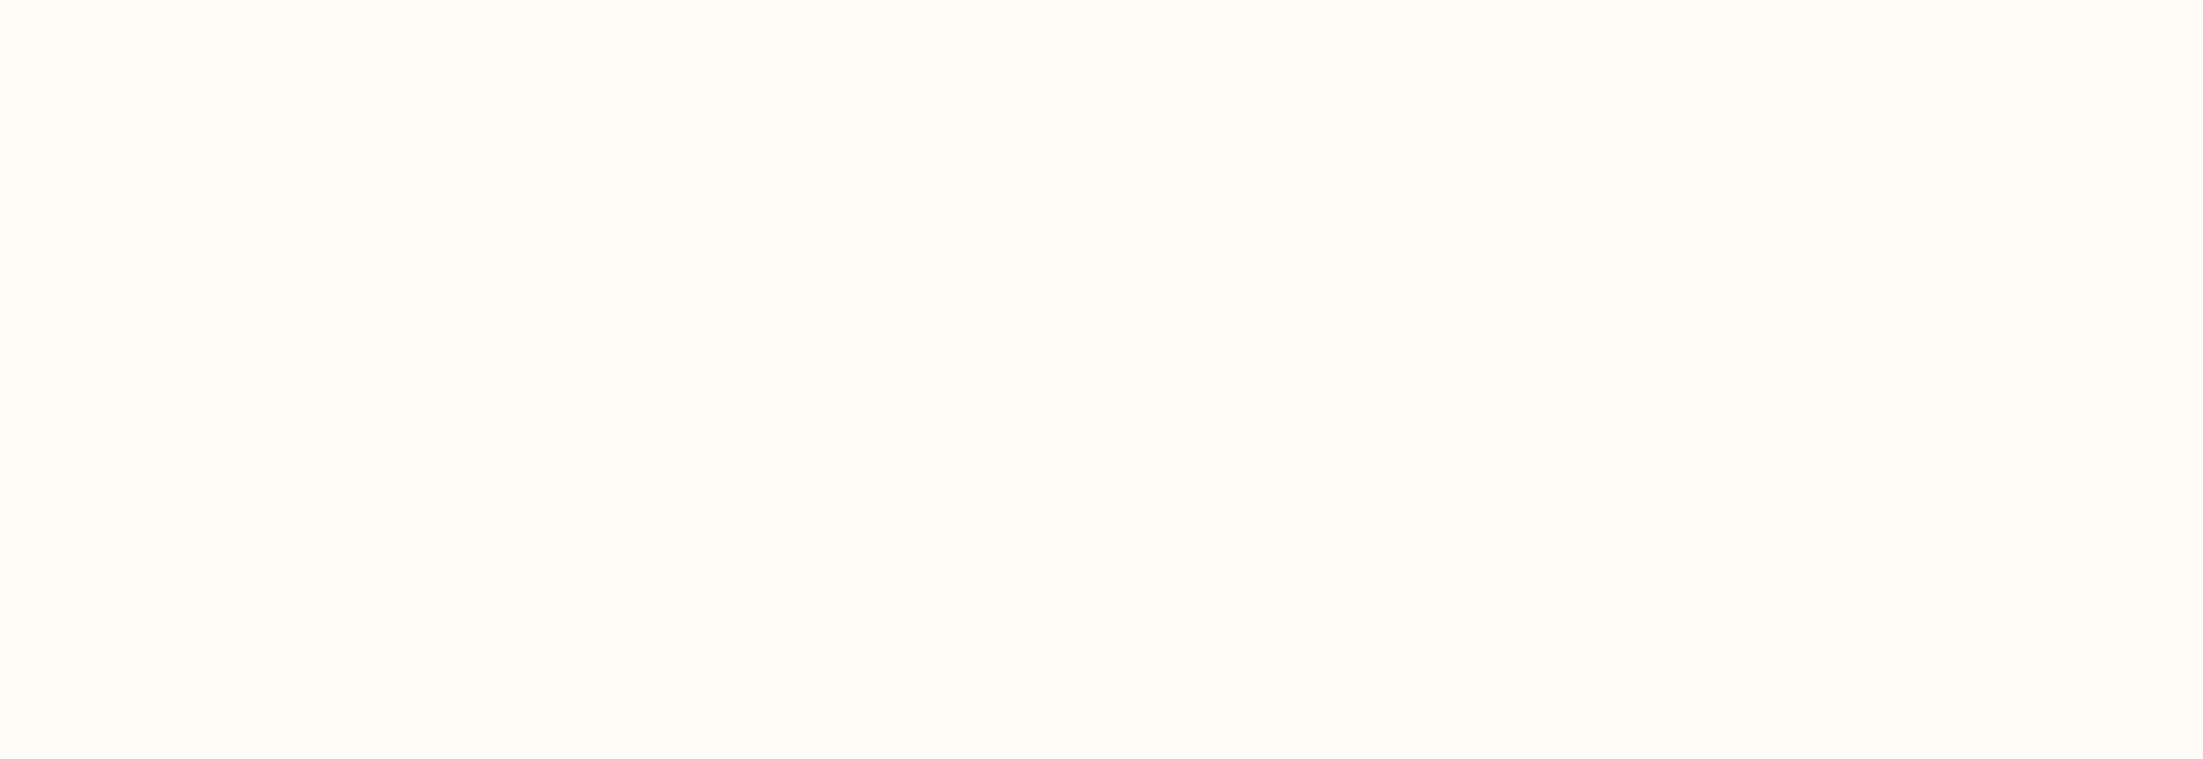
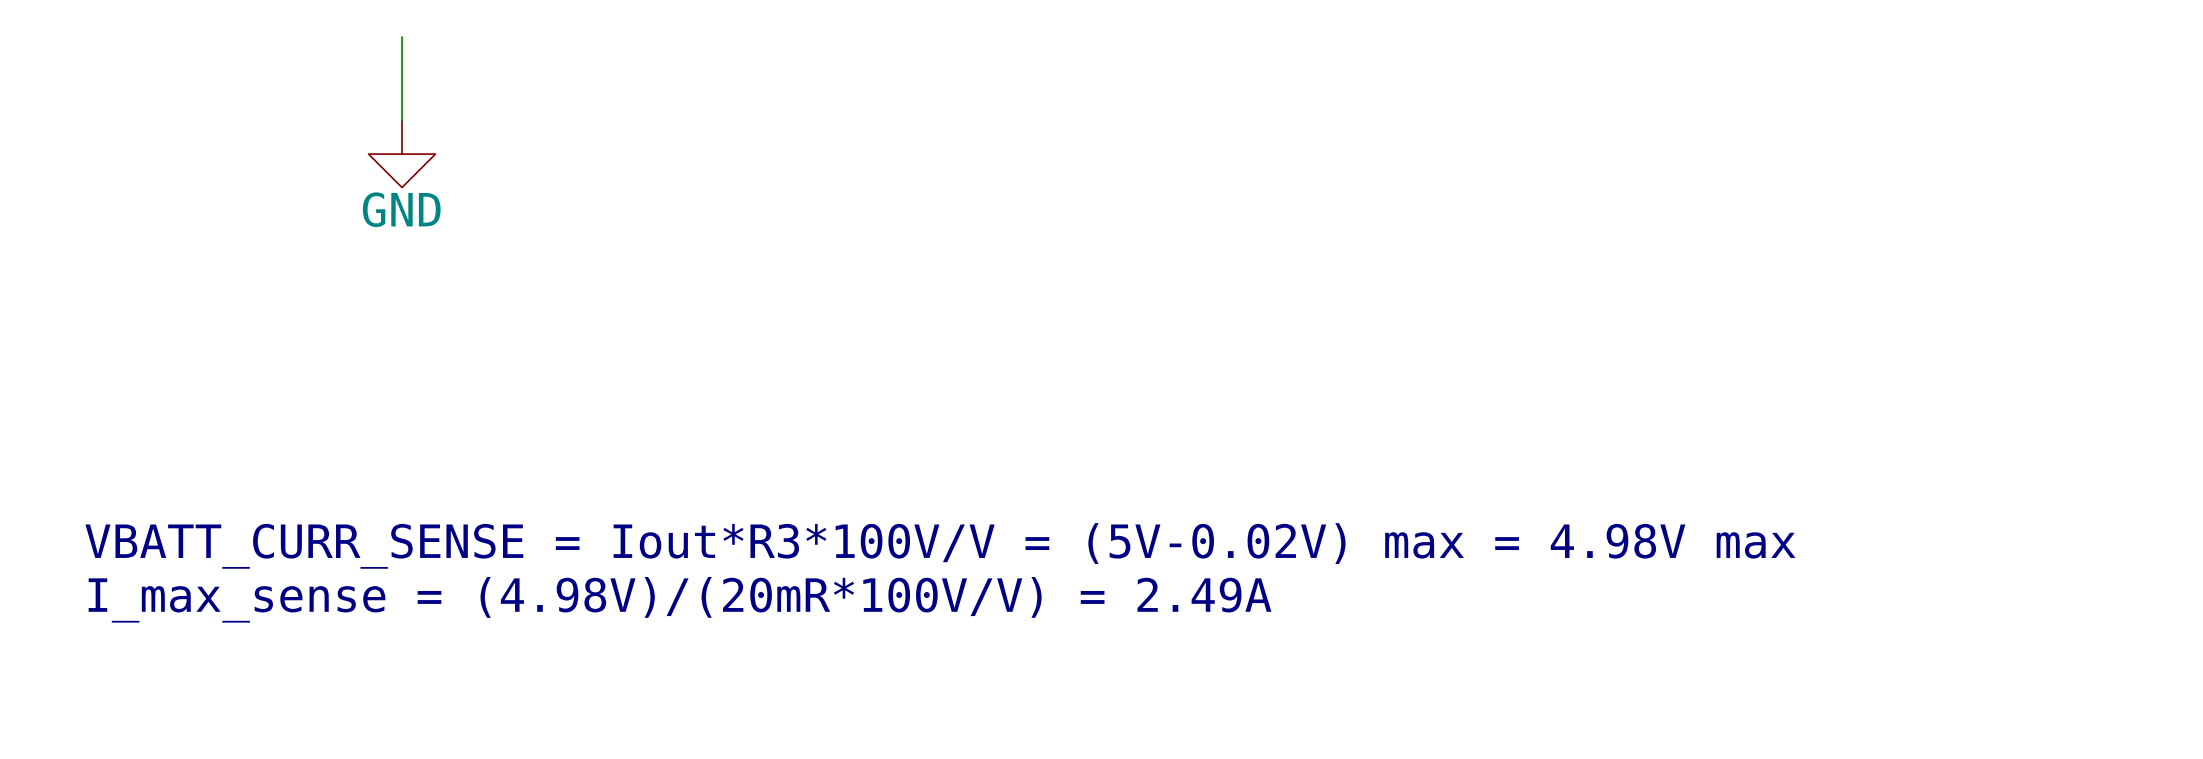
wire: none -> (402, 36) (402, 120)
power symbol: none -> GND (402, 154)
text: none -> VBATT_CURR_SENSE = Iout*R3*100V/V = (5V-0.02V) max = 4.98V max (940, 545)
text: none -> I_max_sense = (4.98V)/(20mR*100V/V) = 2.49A (680, 599)

